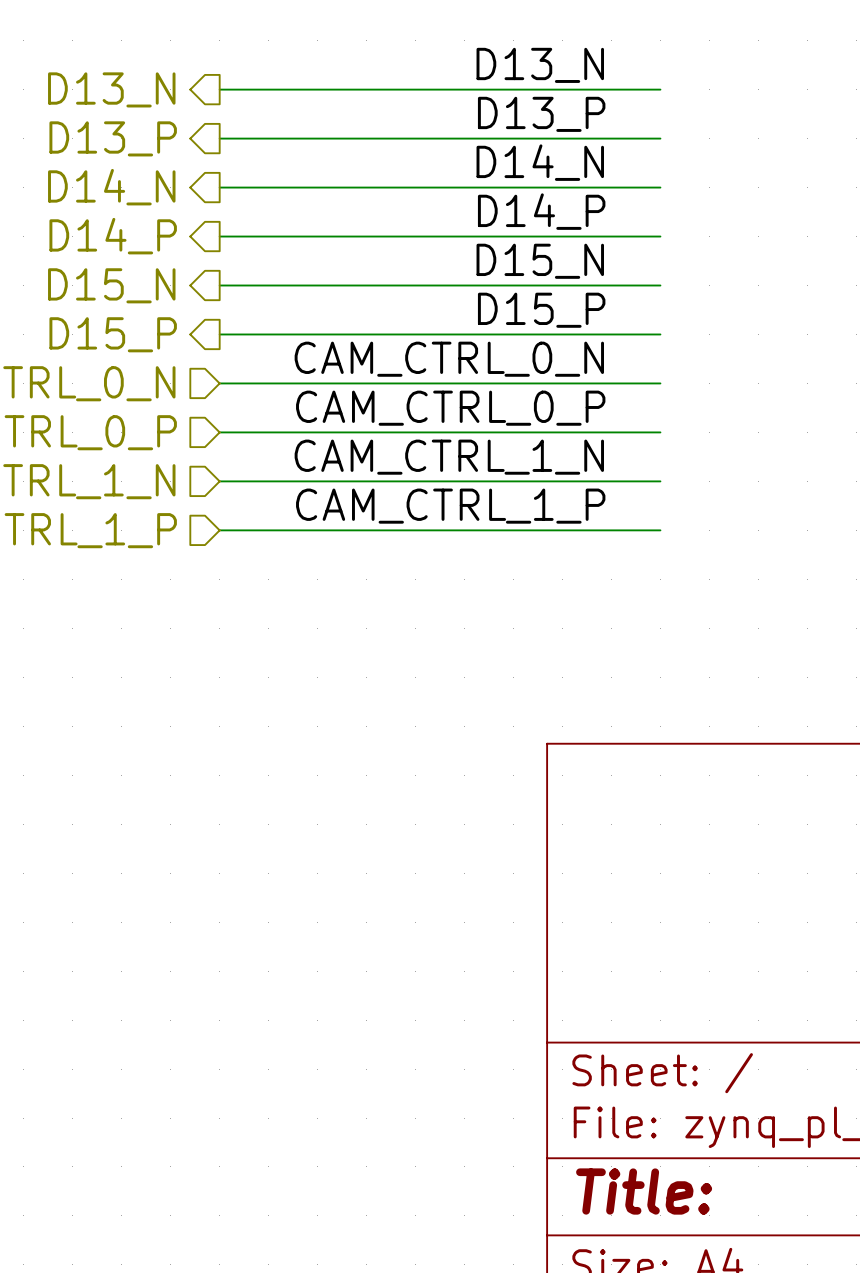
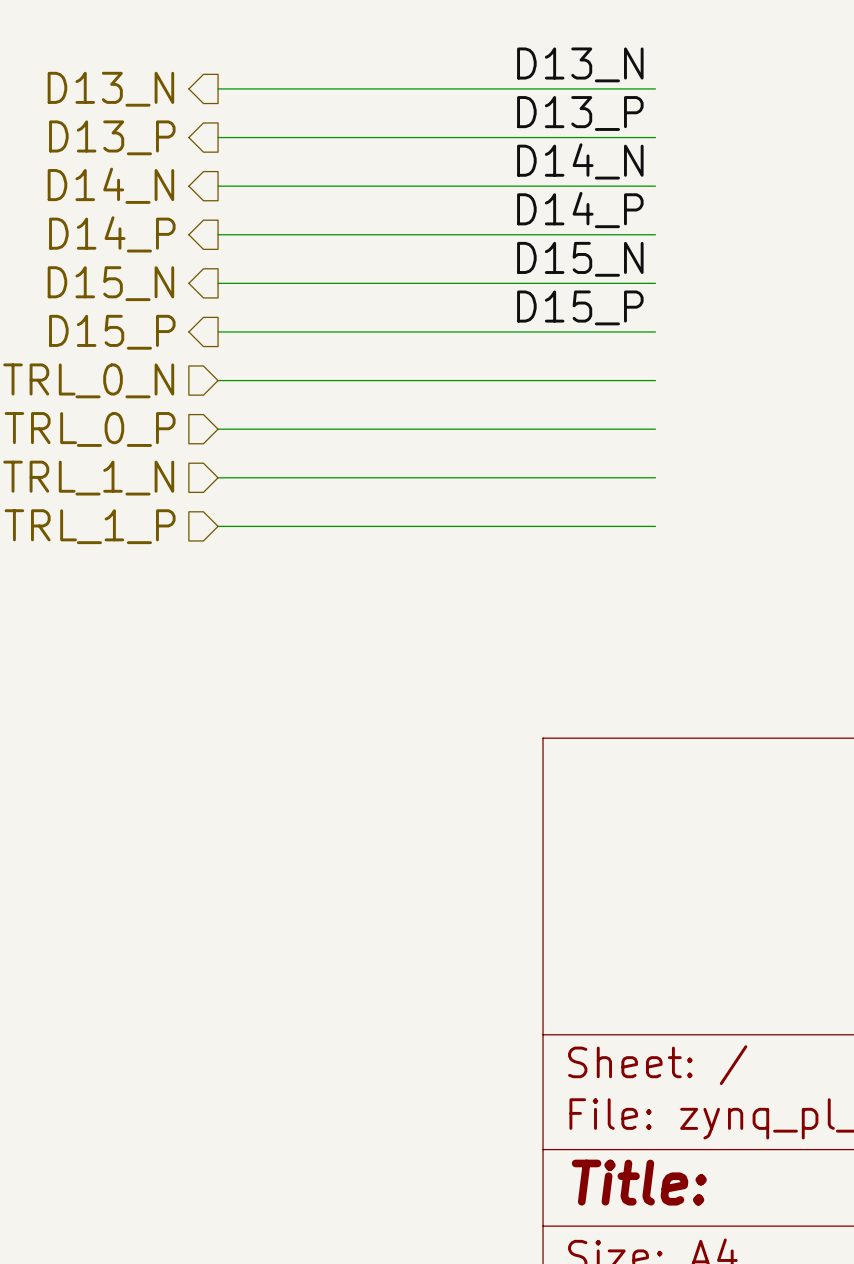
label position: D13_N (540, 65) -> D13_N (580, 64)
label position: D13_P (541, 114) -> D13_P (580, 113)
label position: D14_N (540, 162) -> D14_N (580, 161)
label position: D14_P (541, 211) -> D14_P (580, 210)
label position: D15_N (540, 261) -> D15_N (580, 259)
label position: D15_P (541, 310) -> D15_P (580, 307)
label: CAM_CTRL_0_N (449, 359) -> none
label: CAM_CTRL_0_P (450, 408) -> none
label: CAM_CTRL_1_N (449, 457) -> none
label: CAM_CTRL_1_P (450, 506) -> none

